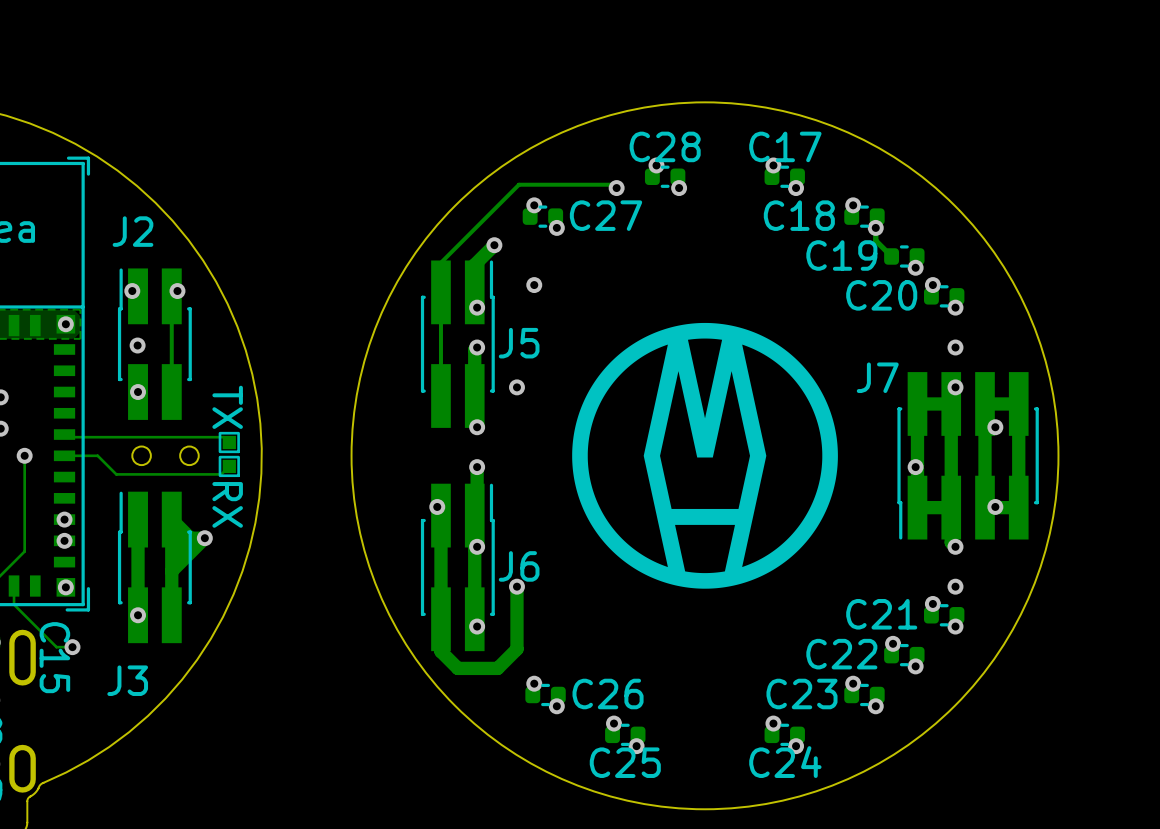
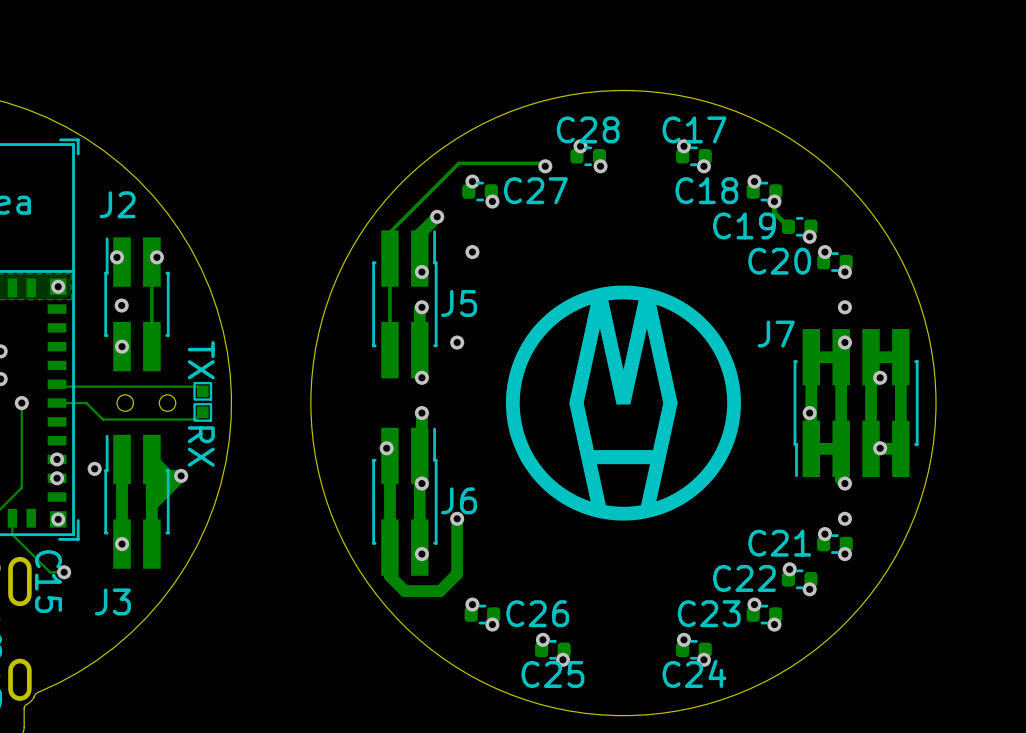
via: none -> (94, 468)

